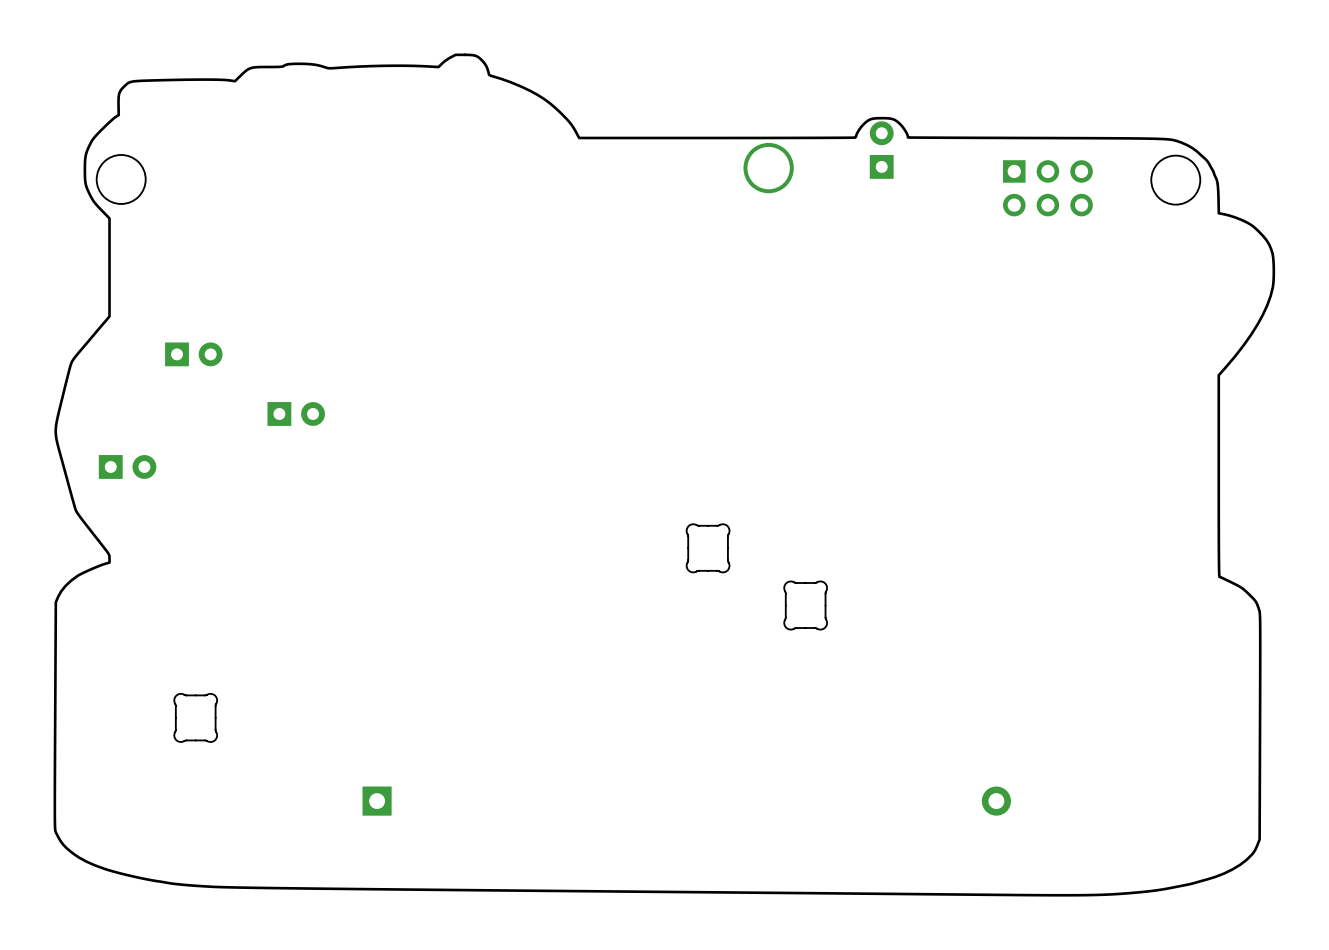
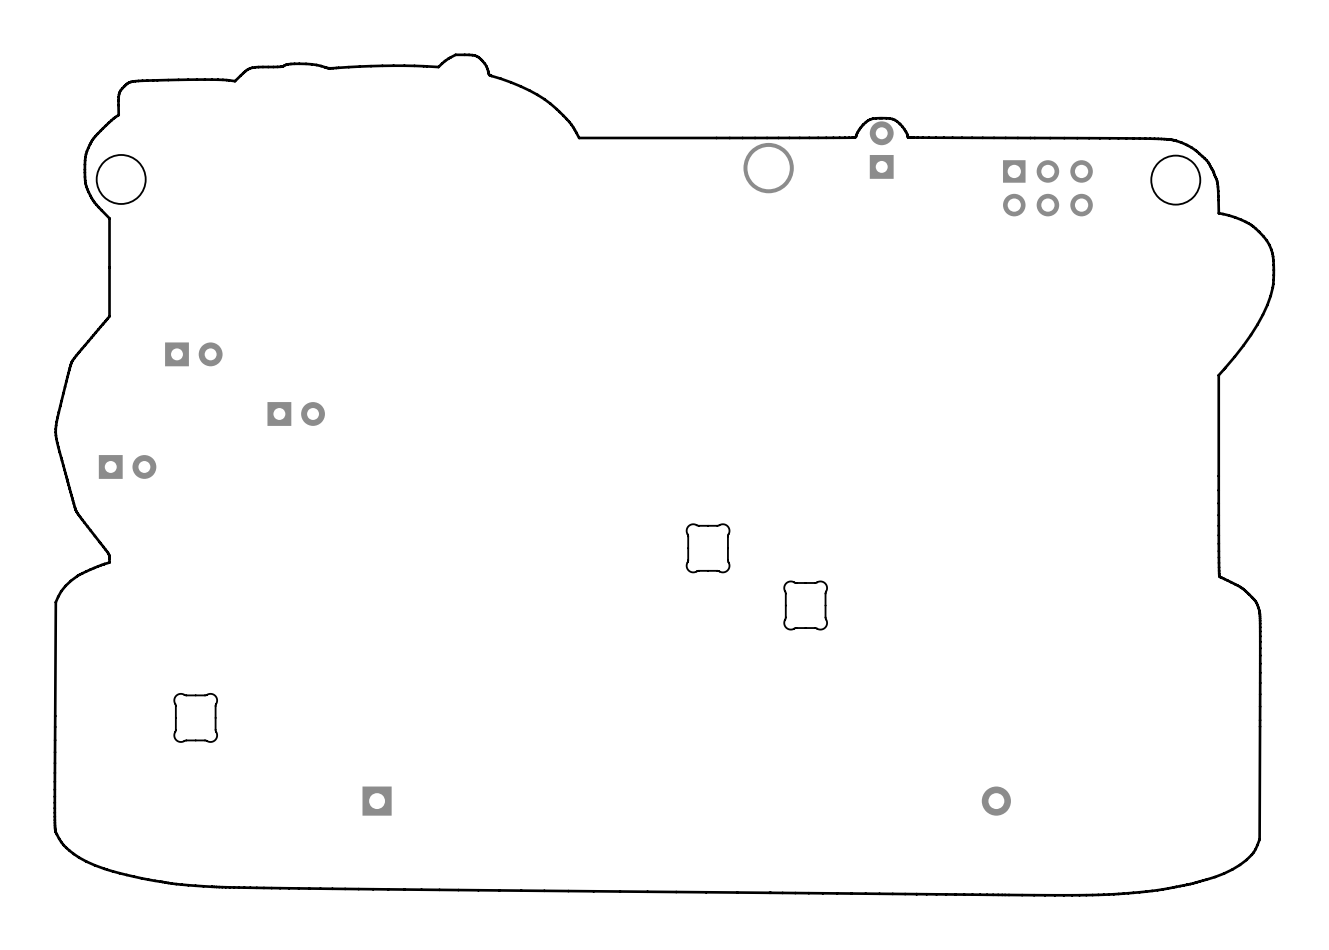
drawing: [53, 53, 1276, 897] -> none
board edge: none -> (455, 54) (438, 67) (393, 65) (330, 68) (311, 64) (290, 63) (282, 66) (249, 68) (235, 81) (196, 79) (130, 81) (119, 92) (118, 115) (97, 133) (89, 144) (85, 160) (86, 186) (94, 202) (109, 218) (109, 316) (71, 362) (55, 432) (75, 510) (108, 553) (109, 562) (77, 576) (65, 586) (55, 602) (55, 827) (59, 838) (66, 847) (86, 861) (119, 873) (171, 883) (212, 886) (1034, 895) (1108, 894) (1168, 888) (1193, 883) (1224, 873) (1240, 864) (1251, 854) (1259, 839) (1259, 614) (1256, 602) (1245, 591) (1219, 576) (1218, 375) (1243, 345) (1262, 314) (1272, 287) (1273, 260) (1269, 244) (1253, 226) (1235, 217) (1218, 213) (1217, 181) (1206, 160) (1186, 145) (1166, 139) (908, 137) (899, 123) (892, 119) (886, 118) (868, 120) (860, 127) (855, 137) (579, 137) (566, 119) (544, 99) (520, 86) (489, 75) (484, 63) (477, 56) (455, 54)

